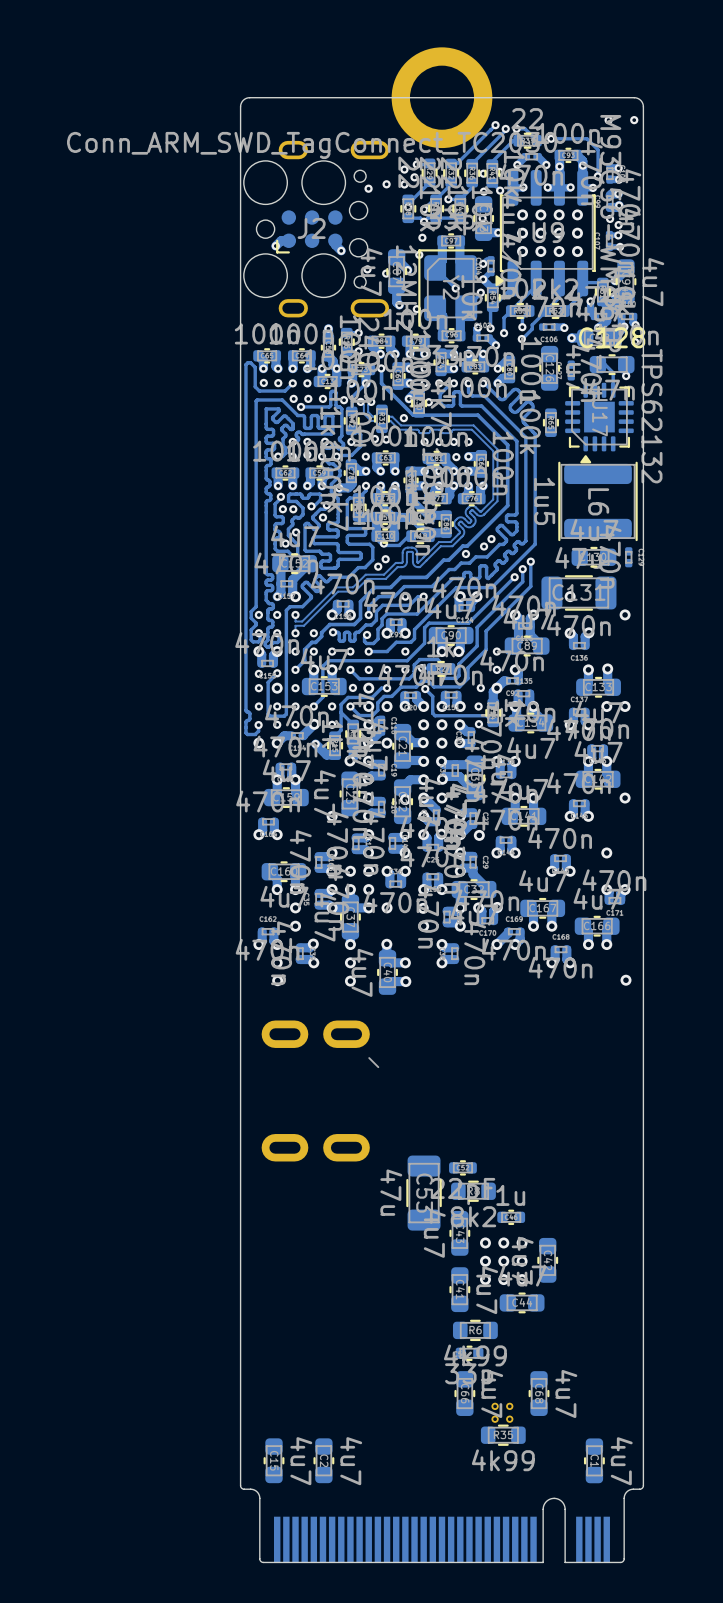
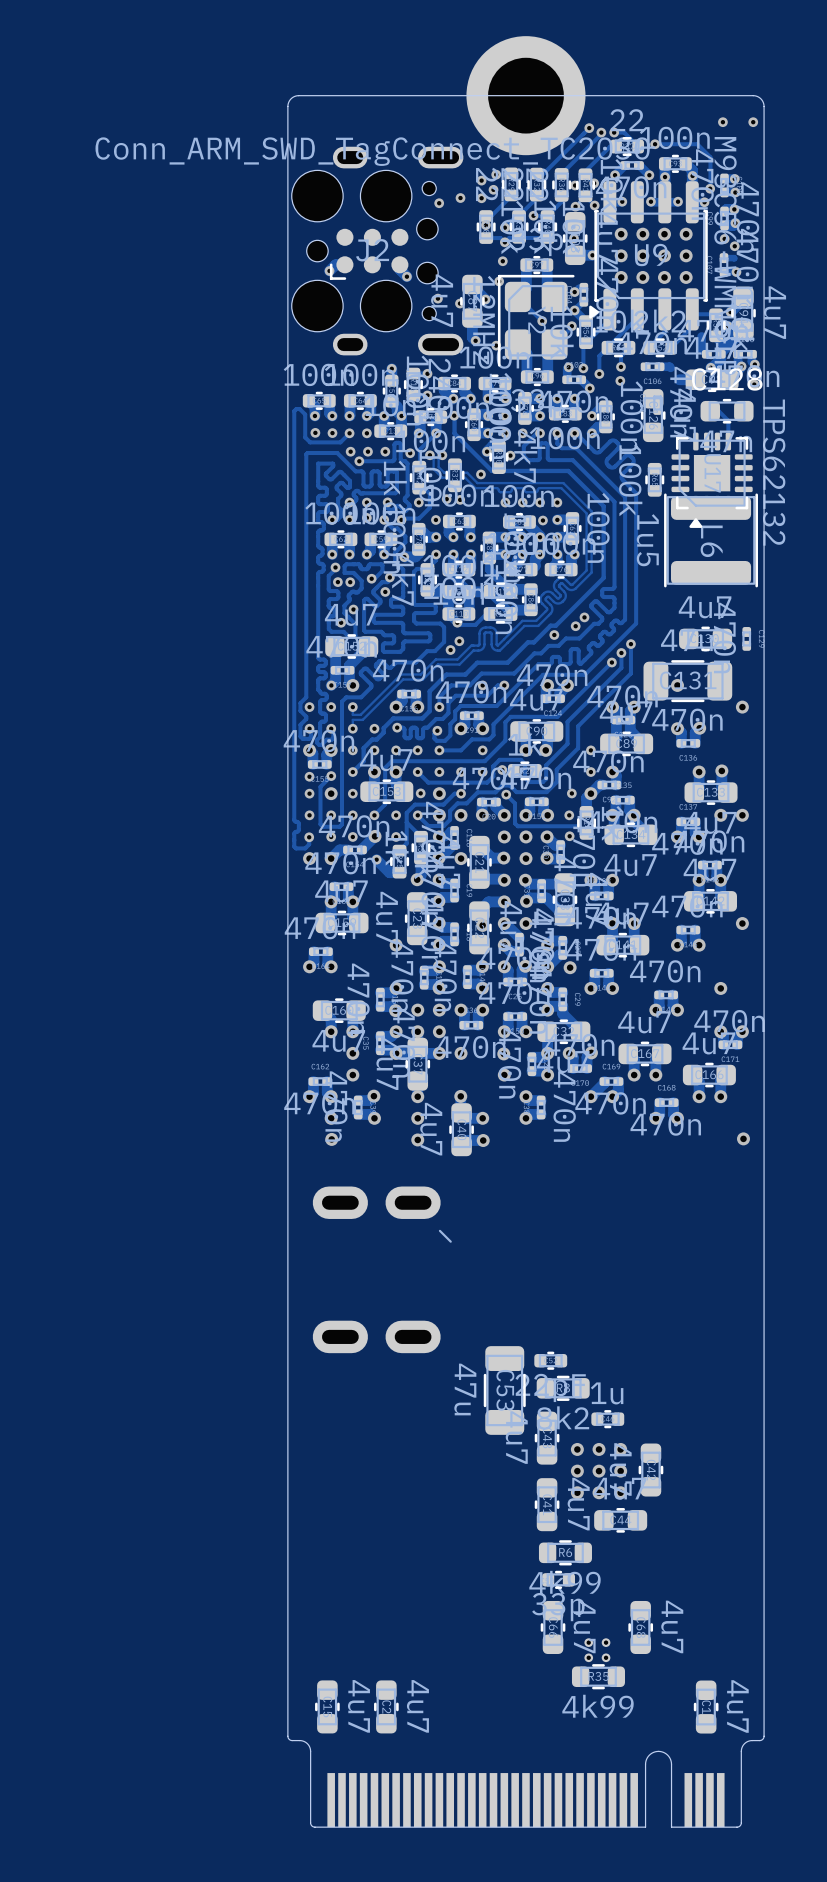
via: (618, 235) -> none
via: (590, 301) -> none
track: (546, 311) (521, 339) -> none
via: (564, 327) -> none
via: (571, 338) -> none
part position: (571, 370) -> (657, 403)
via: (626, 376) -> none
L6 position: (597, 501) -> (711, 540)

